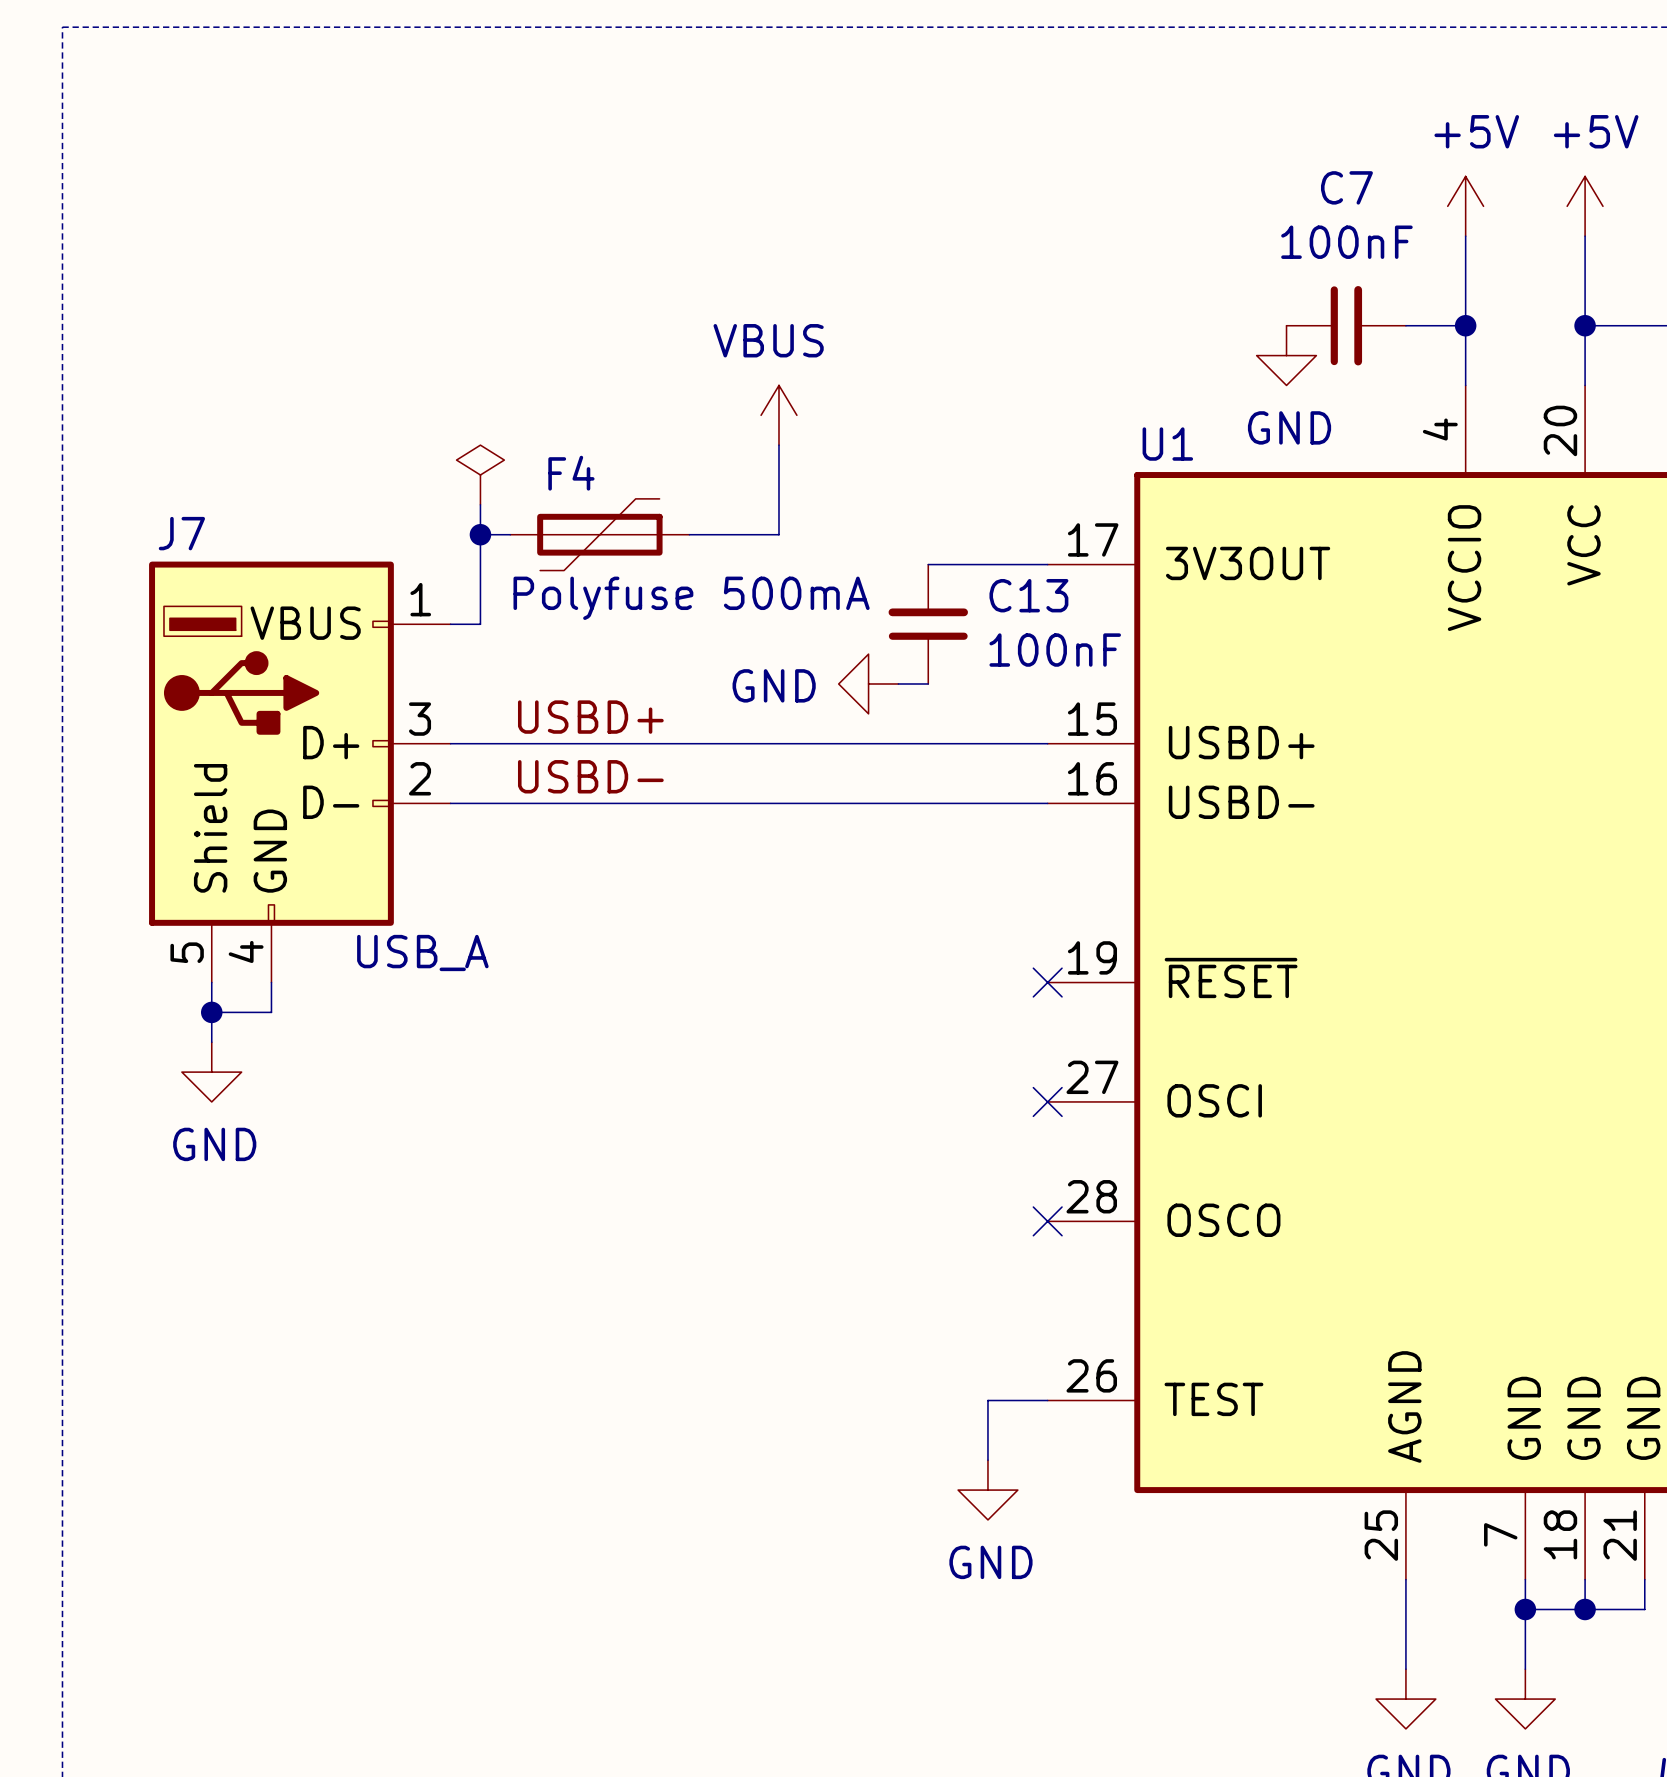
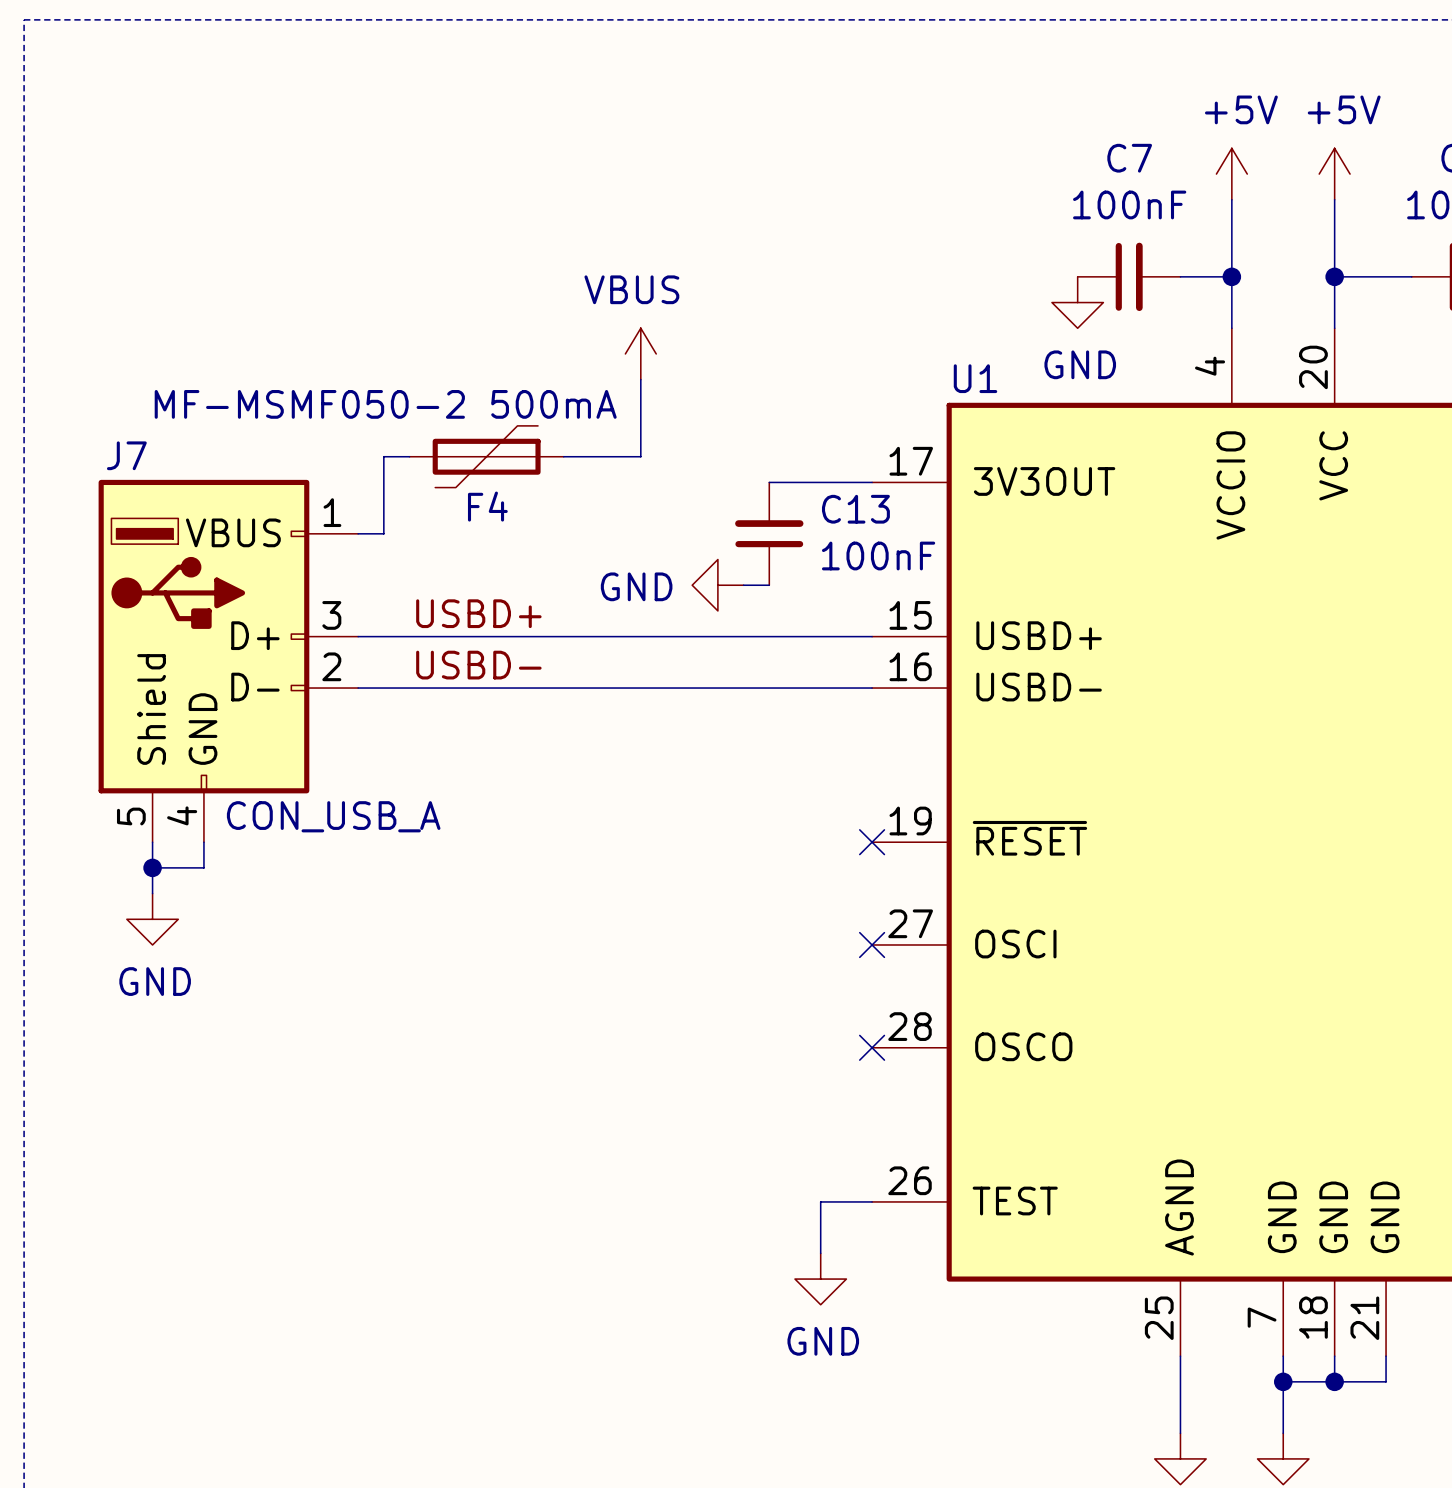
F4 name position: F4 (571, 473) -> F4 (487, 506)
power symbol: (480, 475) -> none
wire: (480, 504) (480, 534) -> none
junction: (480, 534) -> none
F4 value: Polyfuse 500mA (691, 598) -> MF-MSMF050-2 500mA (385, 404)
J7 value: USB_A (422, 952) -> CON_USB_A (333, 816)

